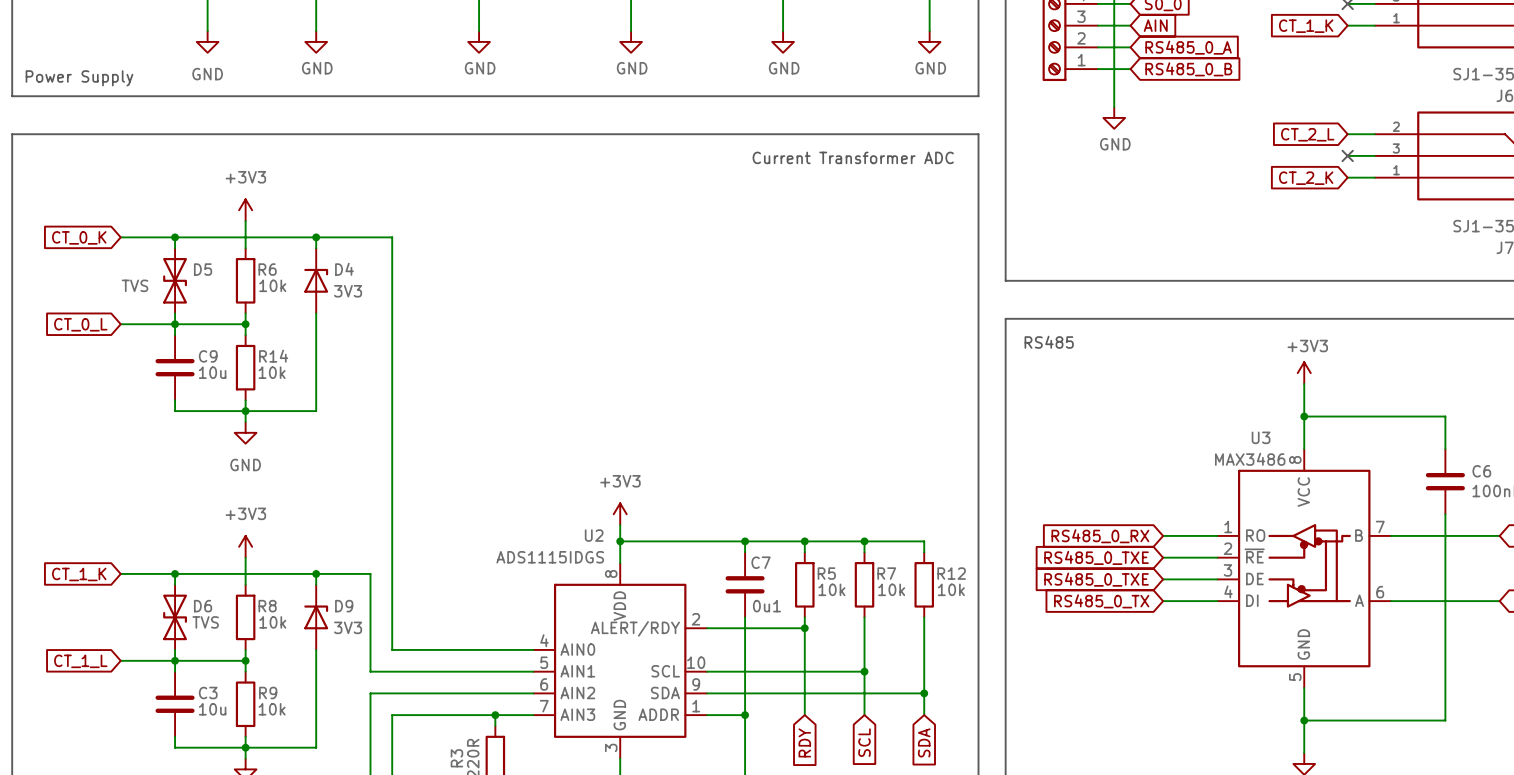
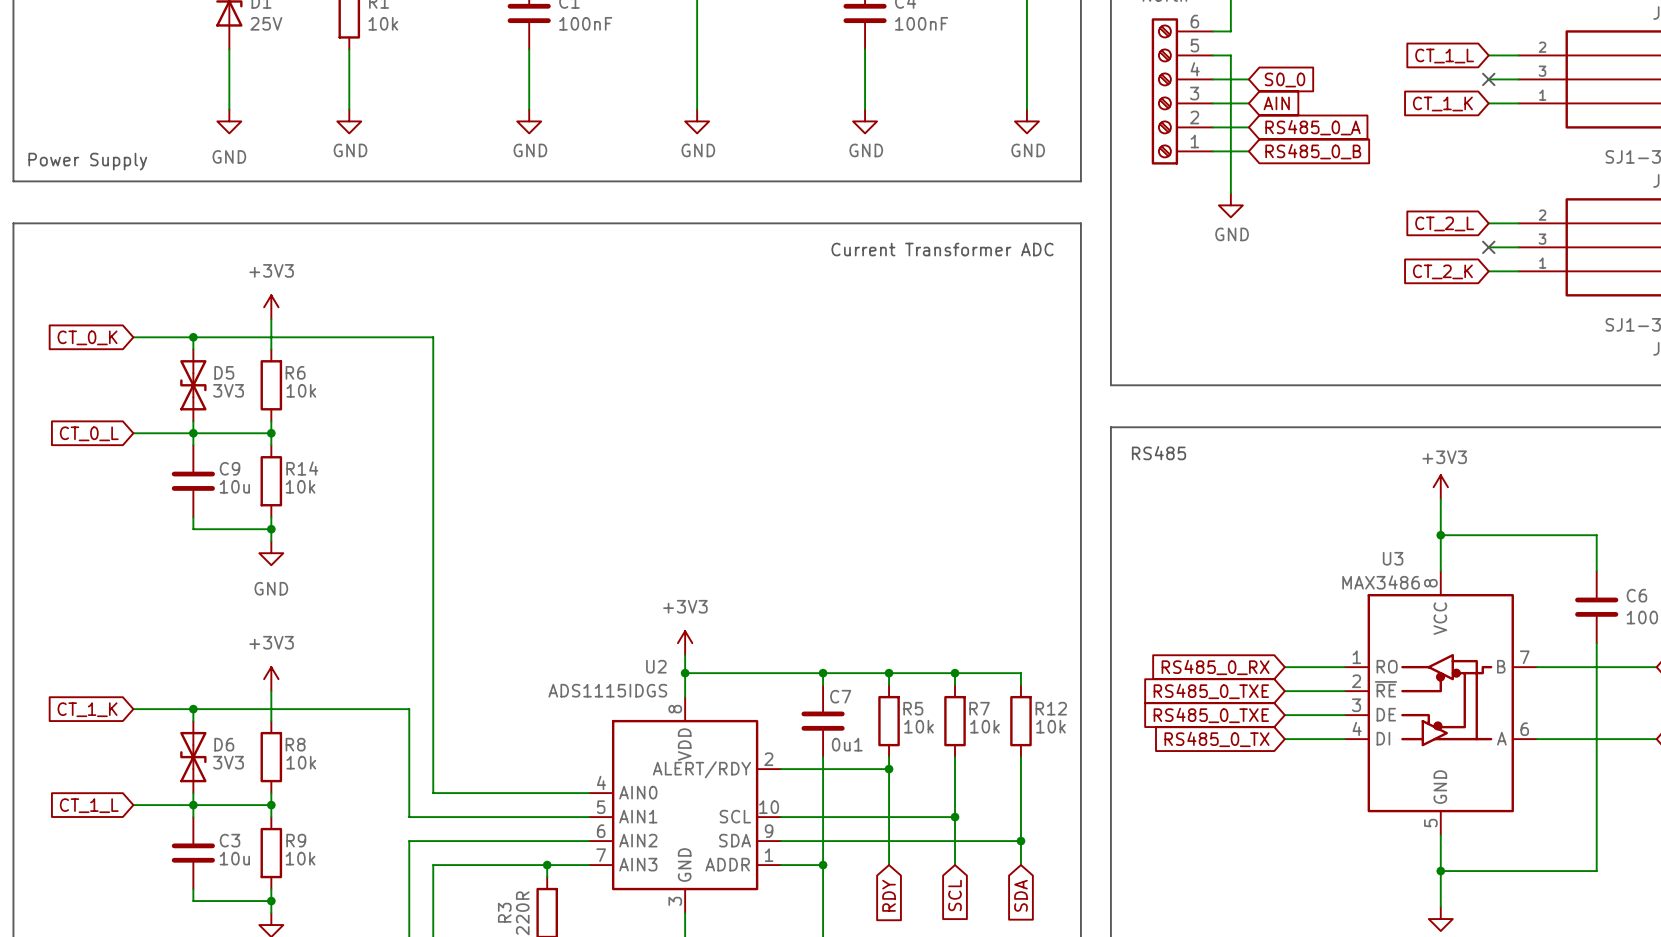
wire: (316, 237) (316, 248) -> none
junction: (316, 237) -> none
D4: 3V3 (316, 280) -> none
D5 value: TVS (135, 285) -> 3V3 (228, 390)
wire: (316, 313) (316, 411) (245, 411) -> none
wire: (316, 573) (316, 584) -> none
junction: (316, 573) -> none
D9: 3V3 (316, 617) -> none
D6 value: TVS (205, 622) -> 3V3 (228, 762)
wire: (316, 649) (316, 747) (245, 747) -> none

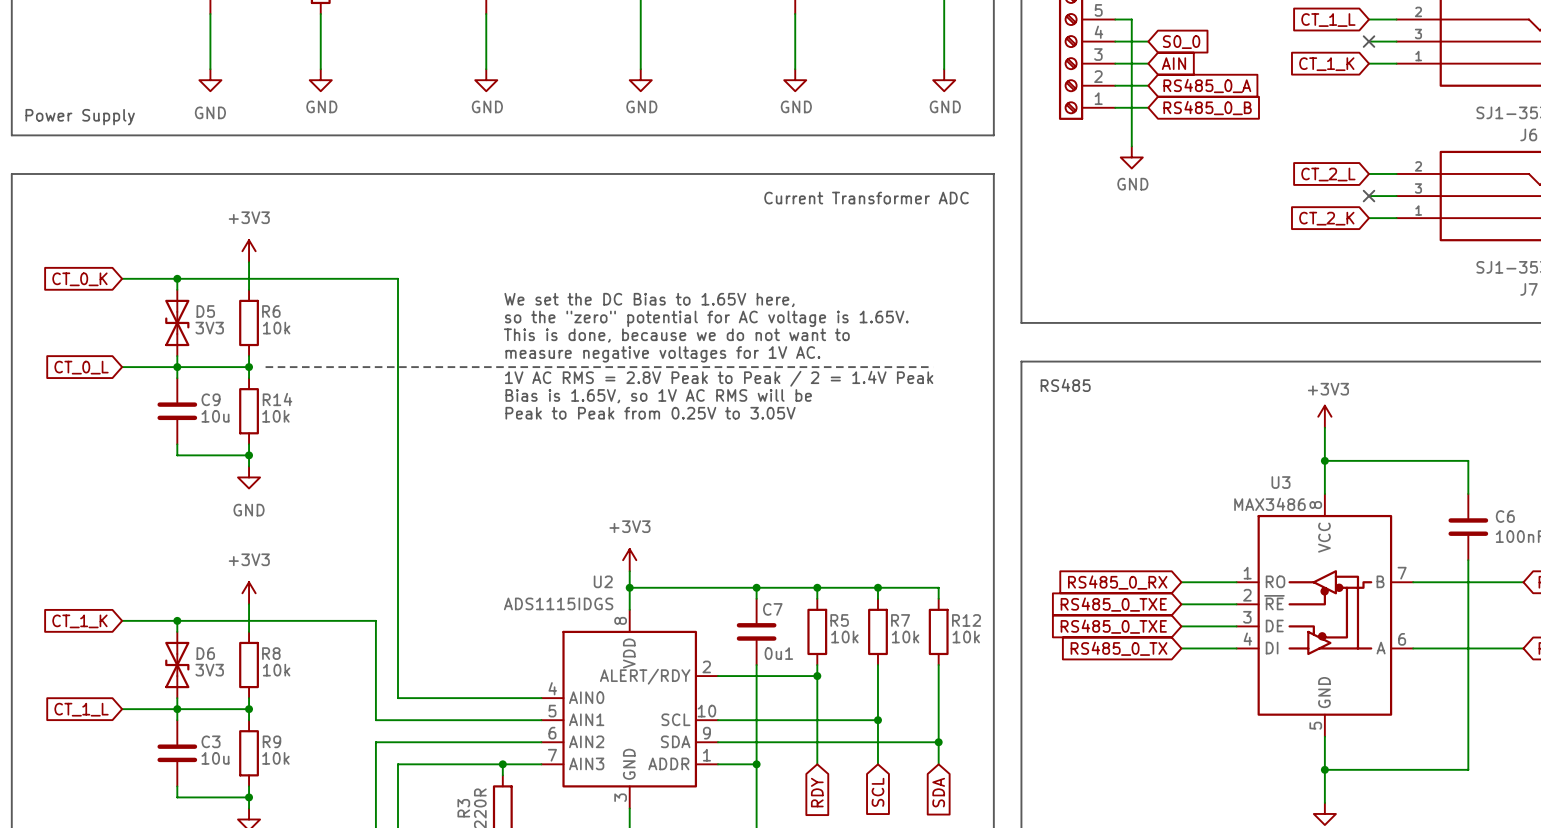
text: none -> We set the DC Bias to 1.65V here, (649, 300)
text: none -> so the "zero" potential for AC voltage is 1.65V. (706, 318)
text: none -> This is done, because we do not want to (676, 335)
text: none -> measure negative voltages for 1V AC. (662, 354)
line: none -> (265, 367) (933, 367)
text: none -> 1V AC RMS = 2.8V Peak to Peak / 2 = 1.4V Peak (719, 378)
text: none -> Bias is 1.65V, so 1V AC RMS will be (658, 396)
text: none -> Peak to Peak from 0.25V to 3.05V (650, 413)

